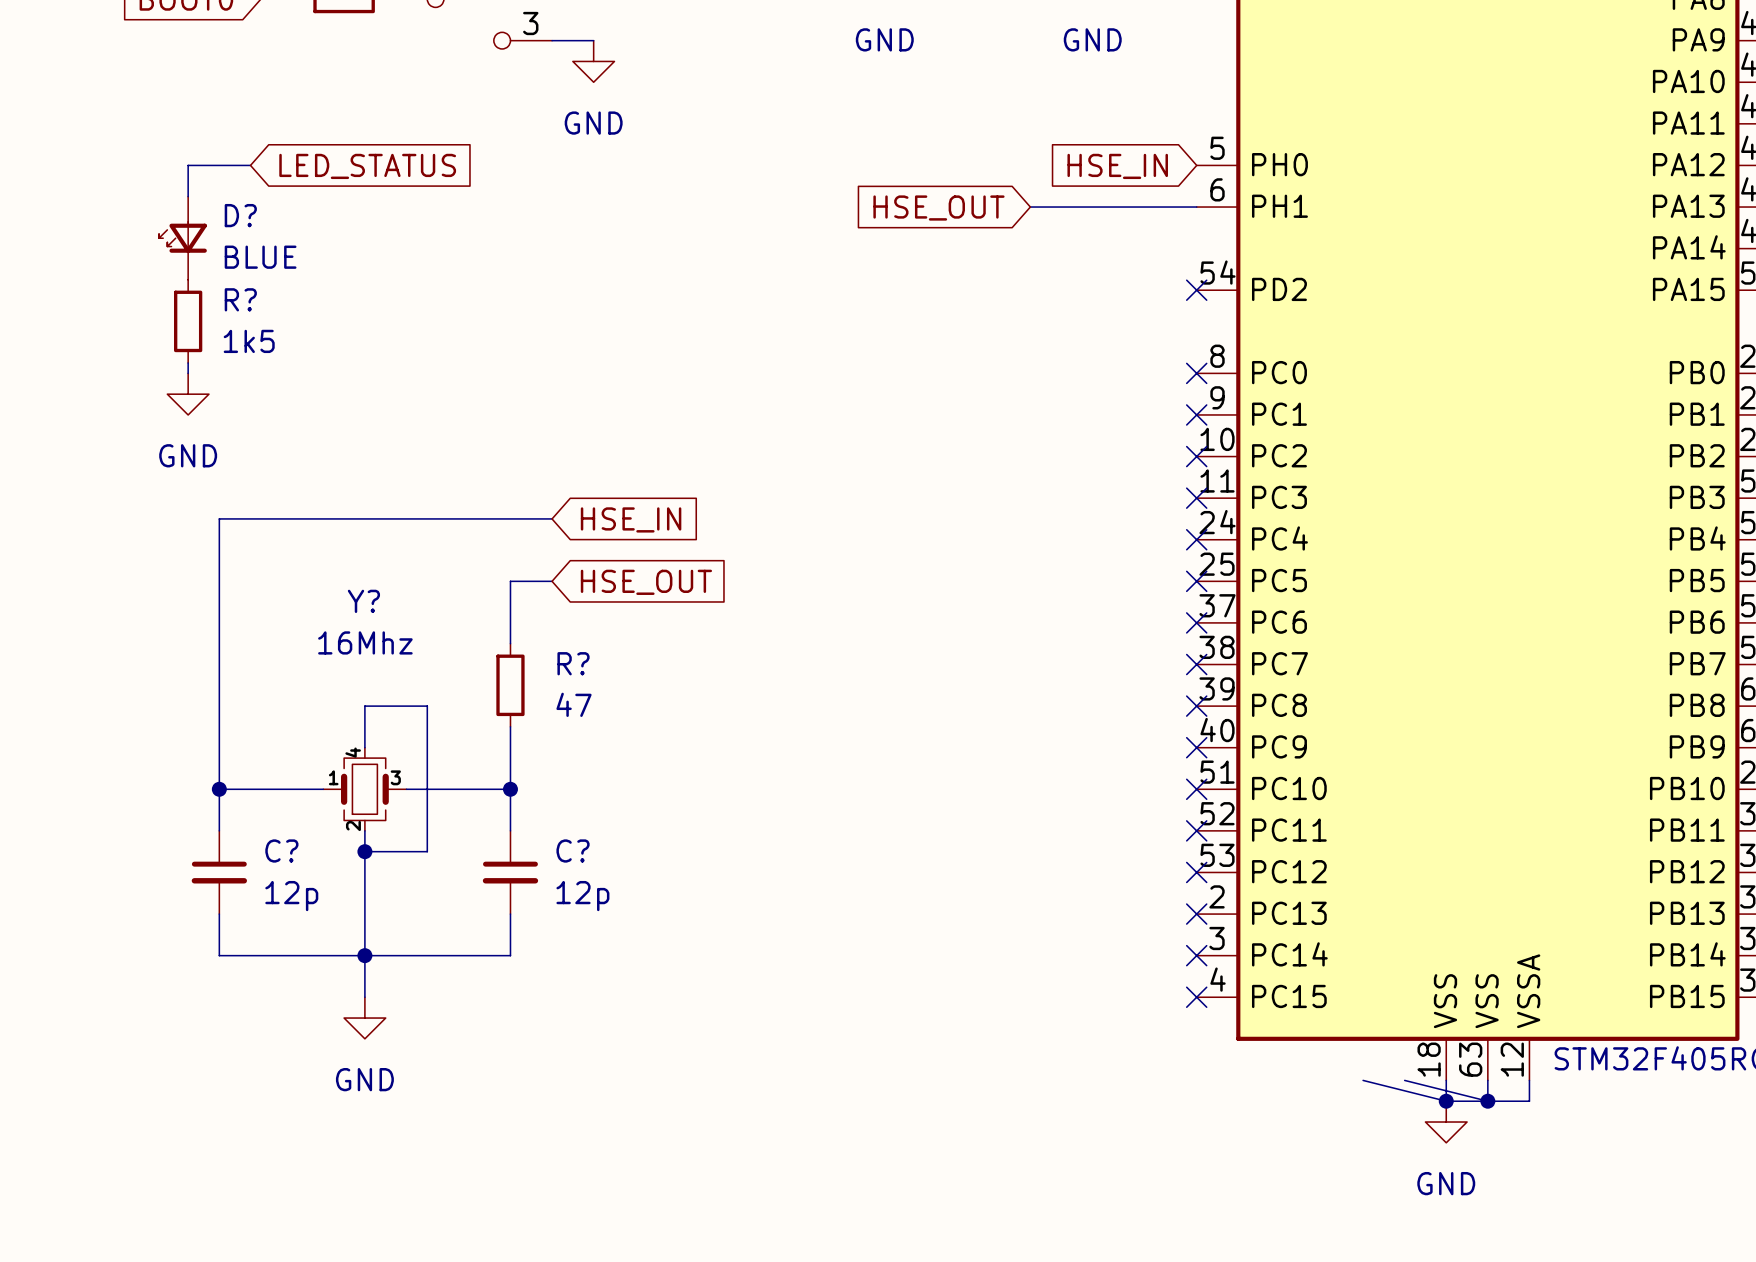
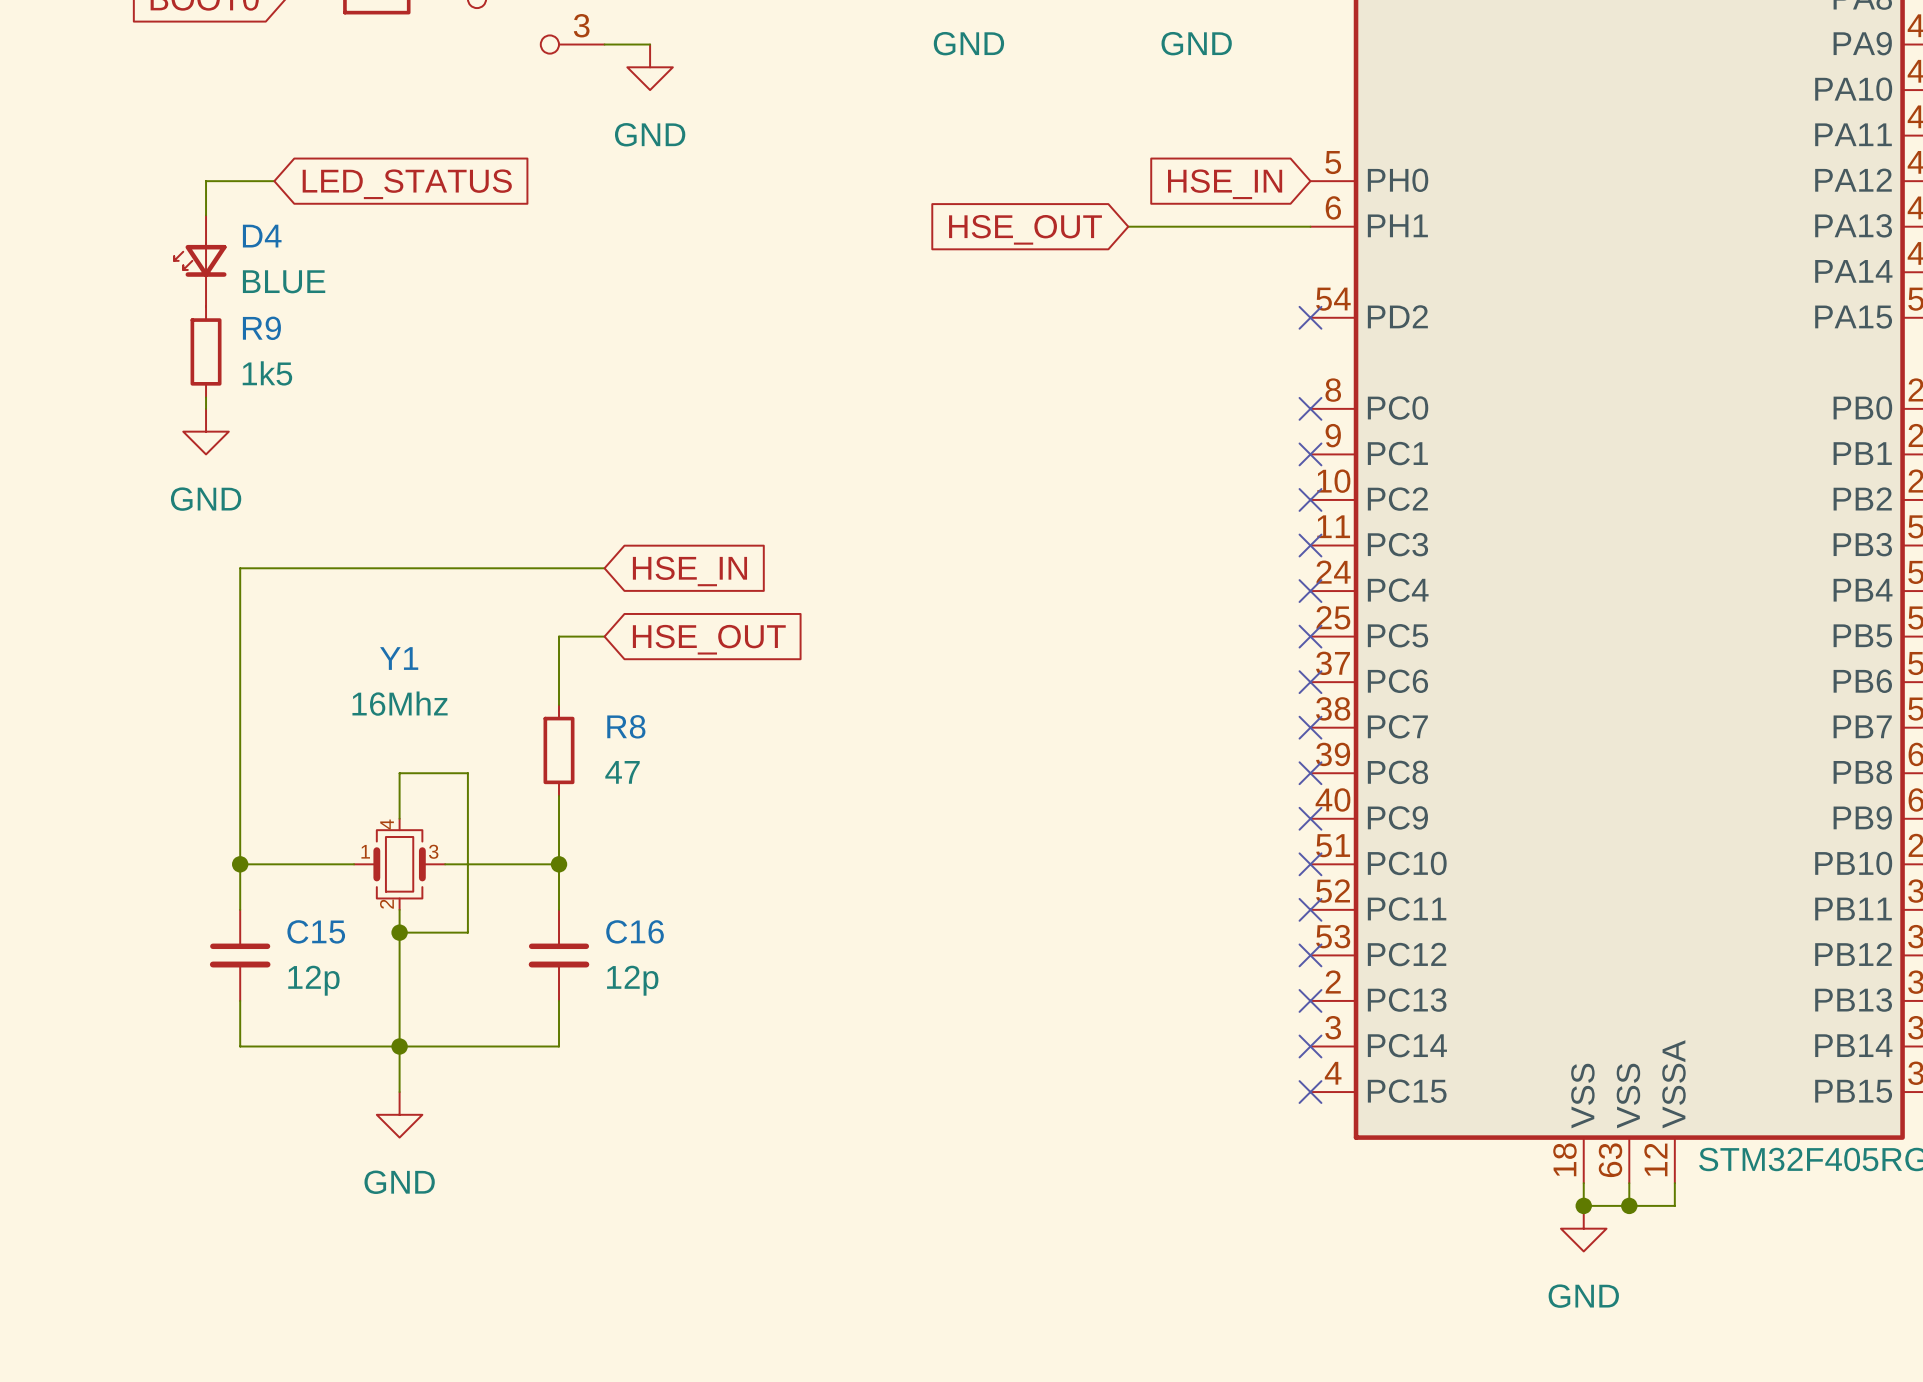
D? name: D? (240, 215) -> D4 (262, 236)
R? name: R? (240, 299) -> R9 (261, 328)
Y? name: Y? (363, 601) -> Y1 (399, 658)
R? name: R? (573, 663) -> R8 (626, 726)
C? name: C? (281, 851) -> C15 (316, 931)
C? name: C? (573, 851) -> C16 (635, 931)
wire: (1363, 1080) (1446, 1101) -> none
wire: (1404, 1080) (1487, 1101) -> none

